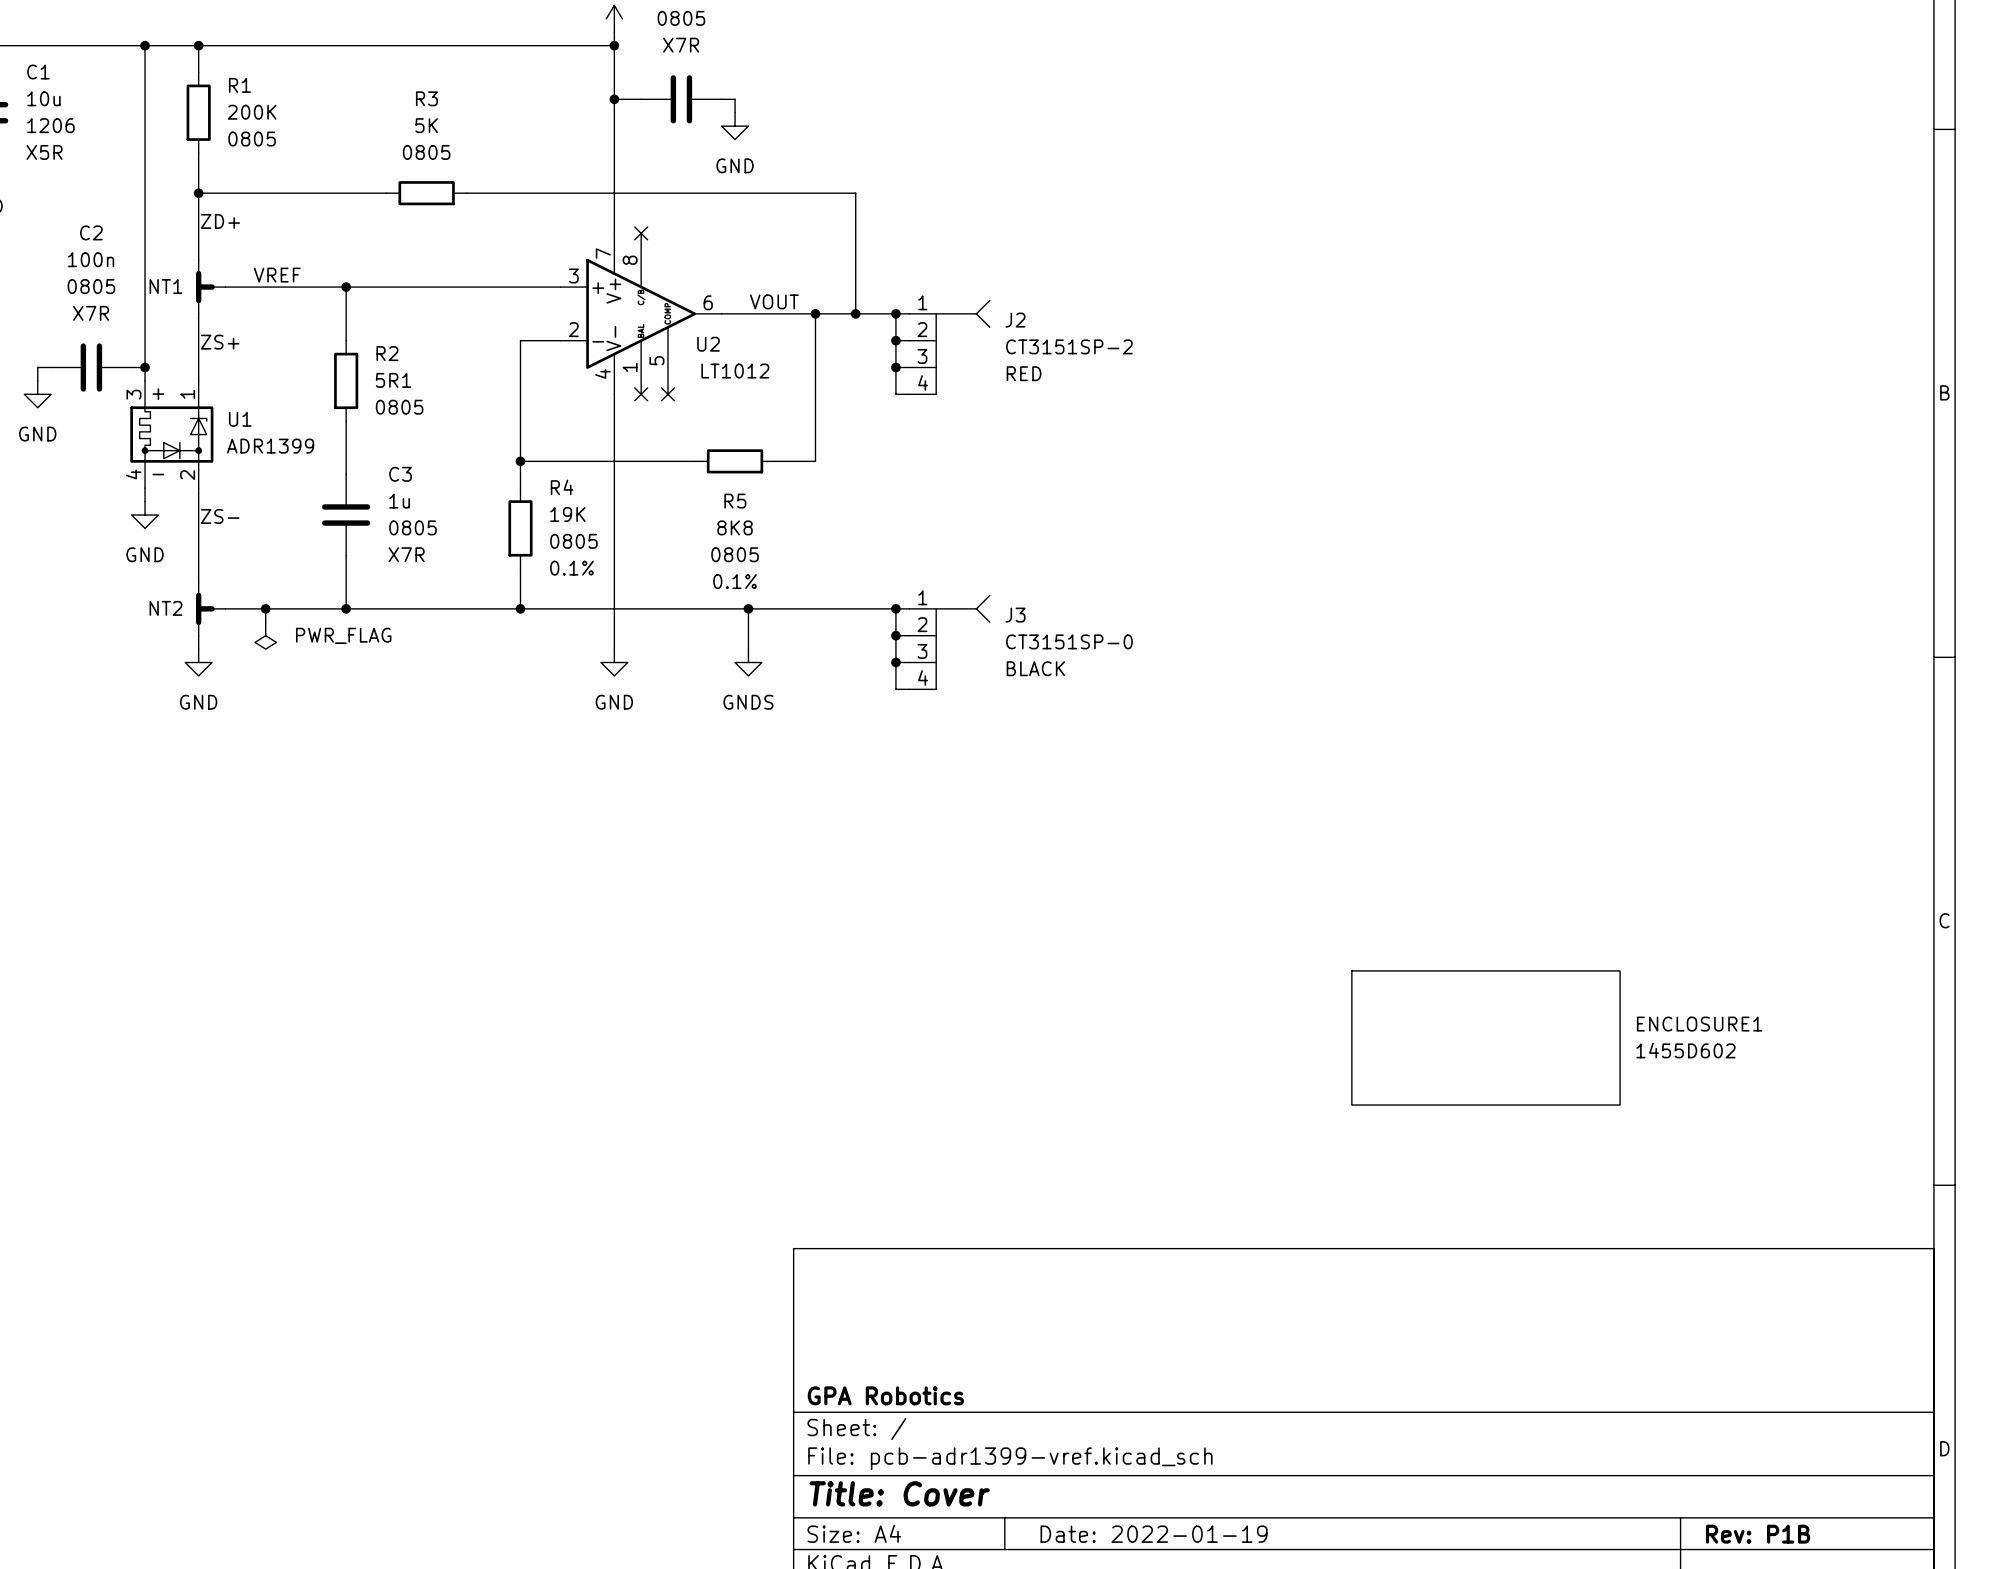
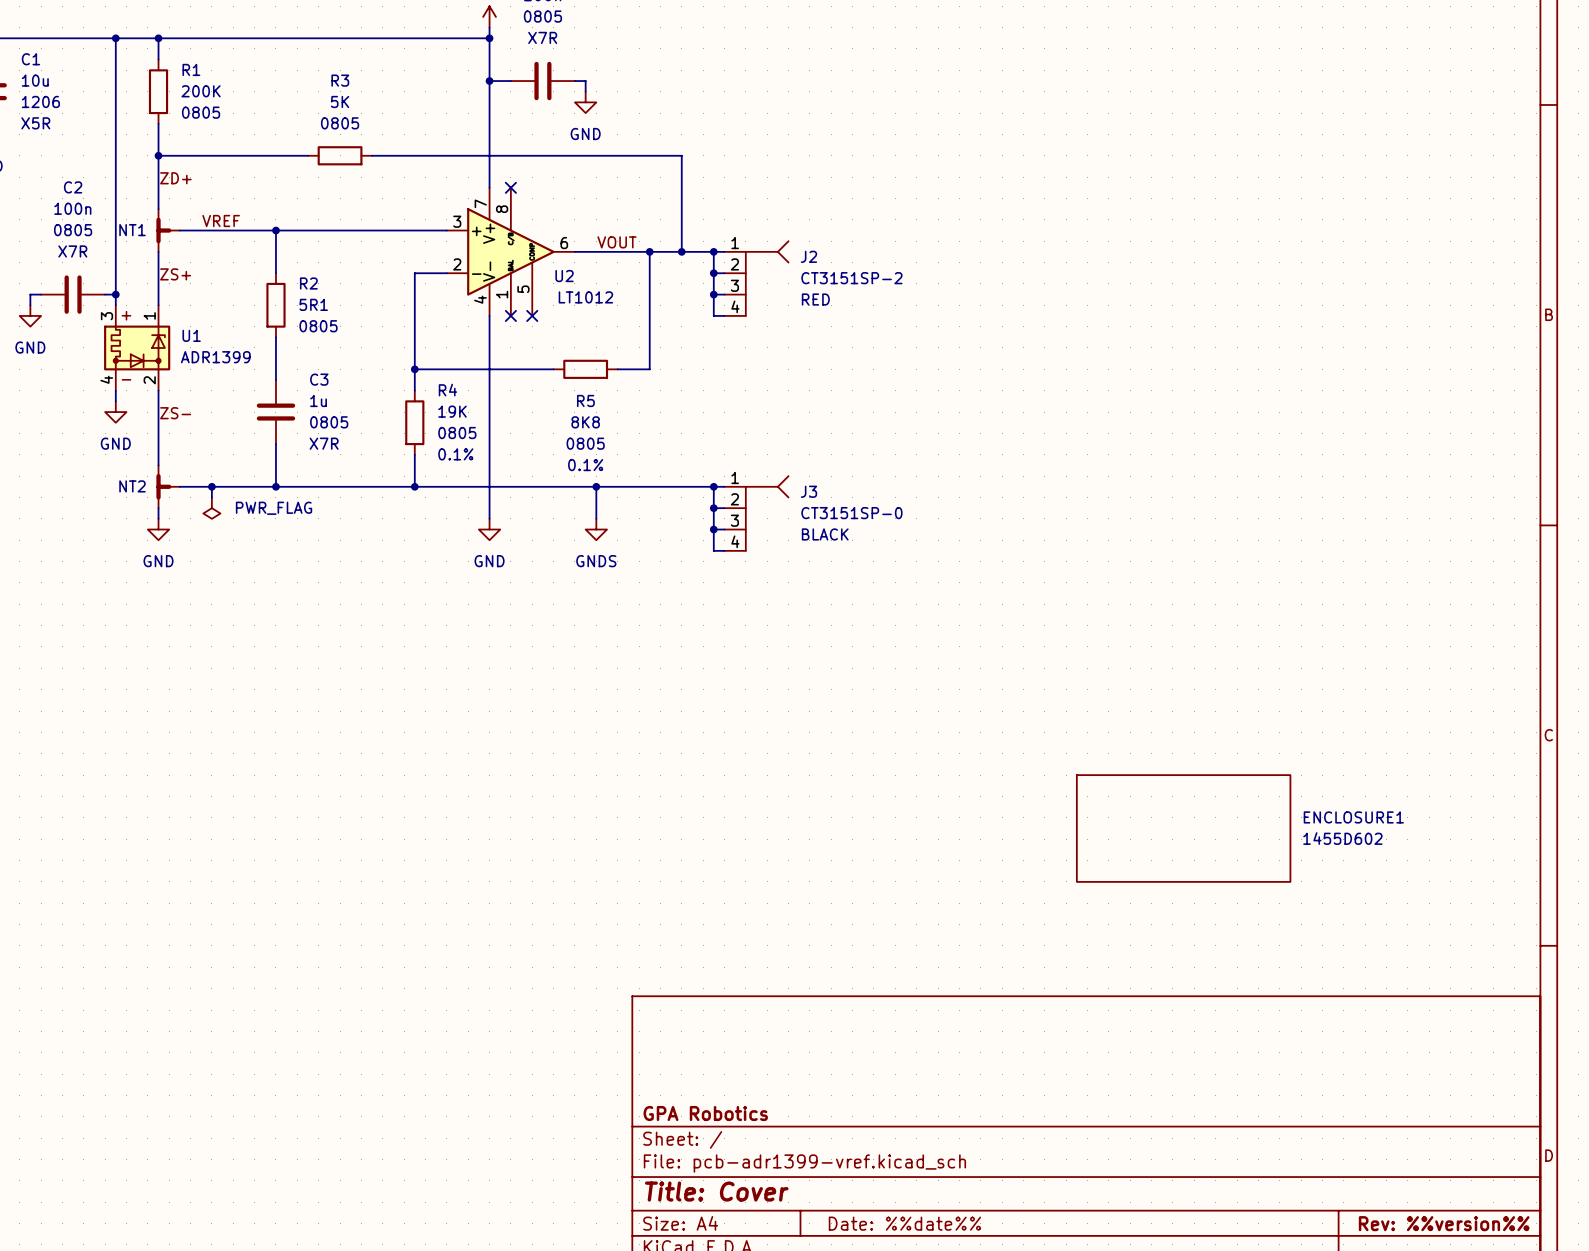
title block: Date: 2022-01-19 (1154, 1534) -> Date: %%date%% (904, 1223)
title block: Rev: P1B (1758, 1534) -> Rev: %%version%% (1444, 1223)

